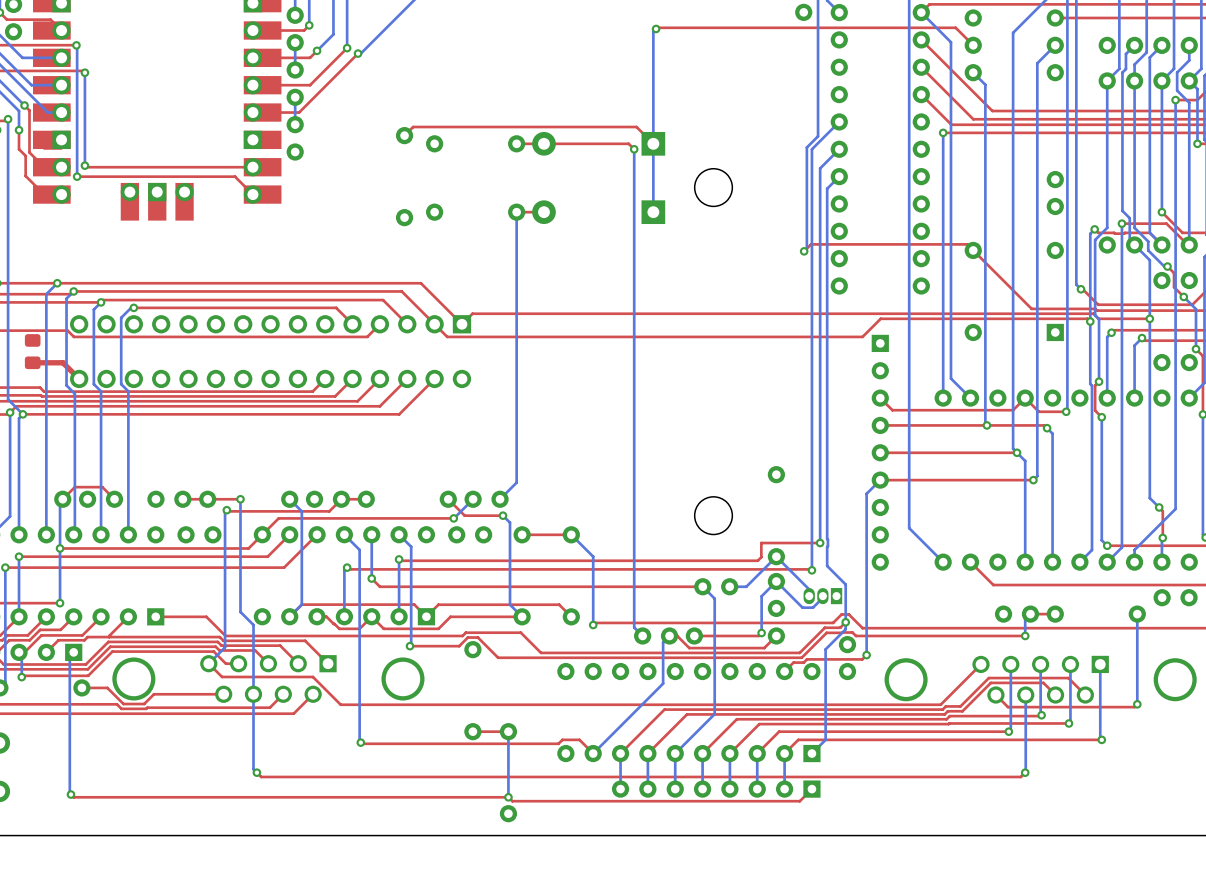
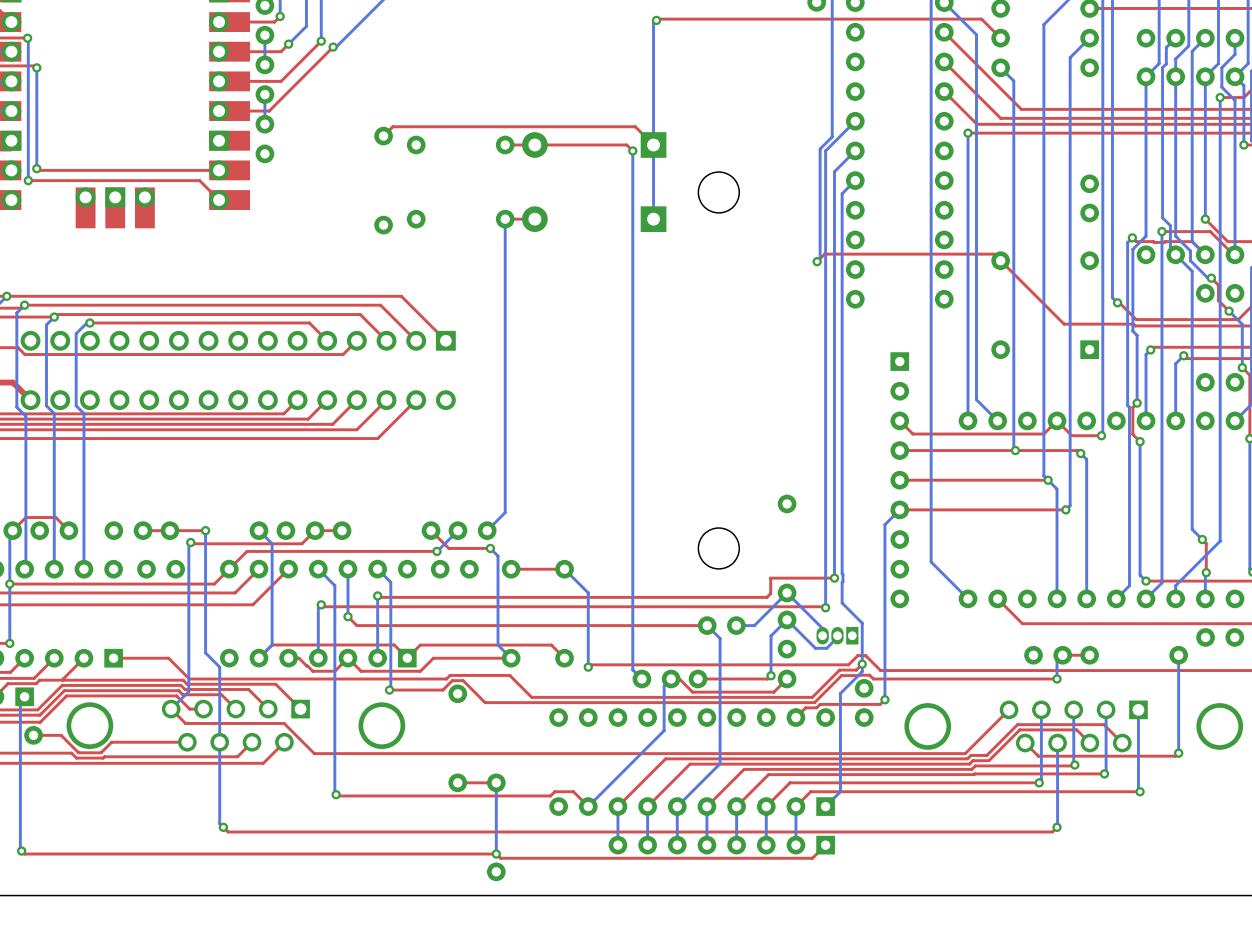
top track: (1149, 318) (1098, 318) (1093, 313) (472, 313) (461, 324) -> none
via: (1149, 318) -> none
top track: (1090, 321) (1087, 318) (880, 318) (862, 336) (447, 336) (434, 324) -> none
via: (1090, 321) -> none

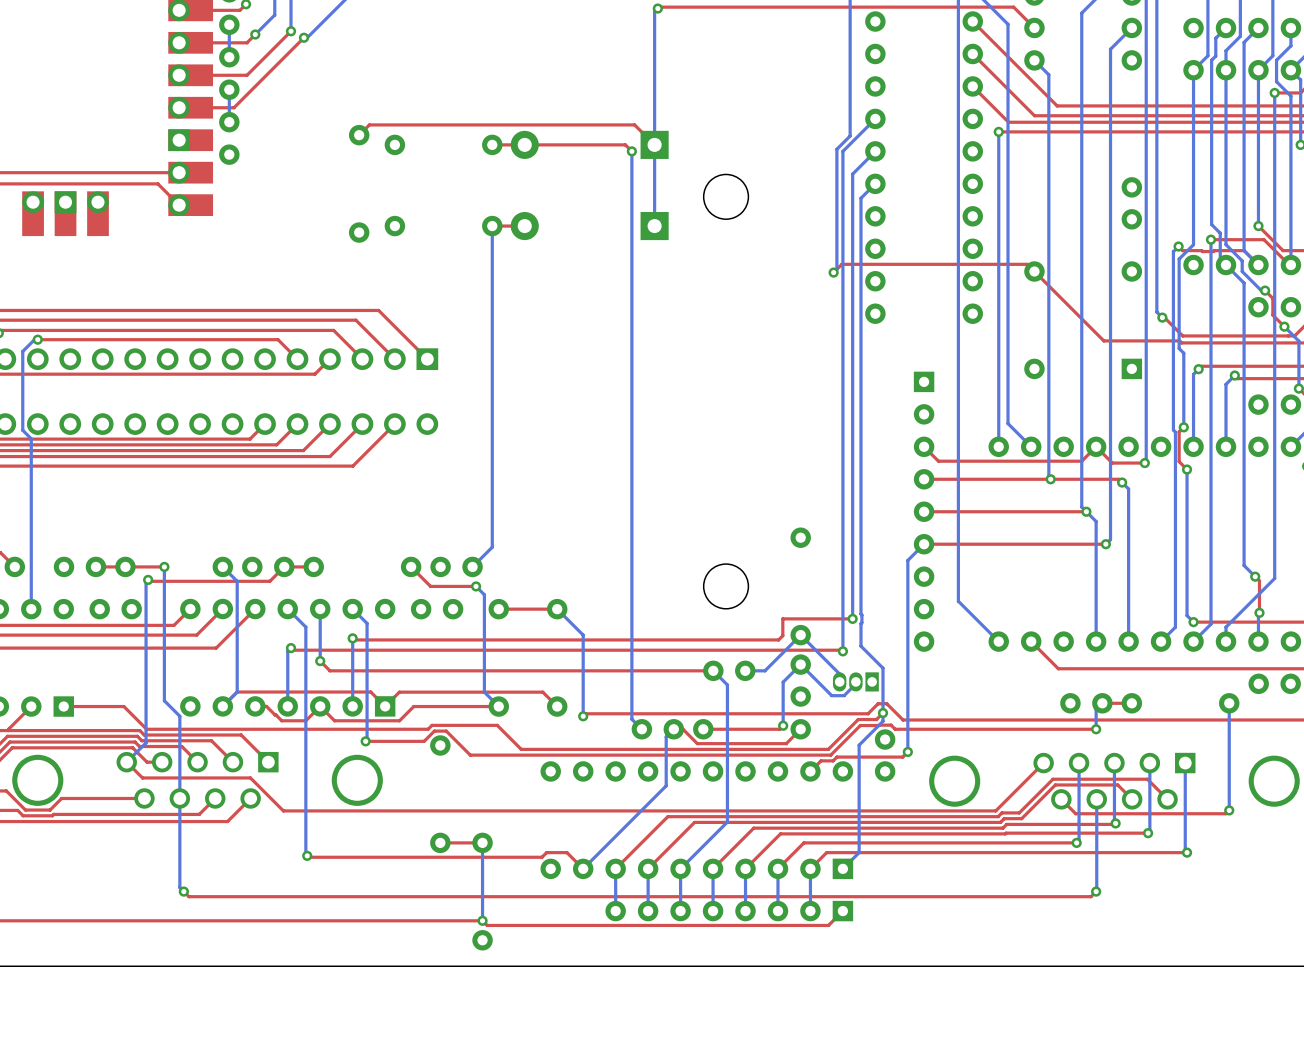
bottom track: (457, 530) (437, 551) -> none
top track: (436, 551) (247, 551) (229, 569) -> none
via: (436, 551) -> none

